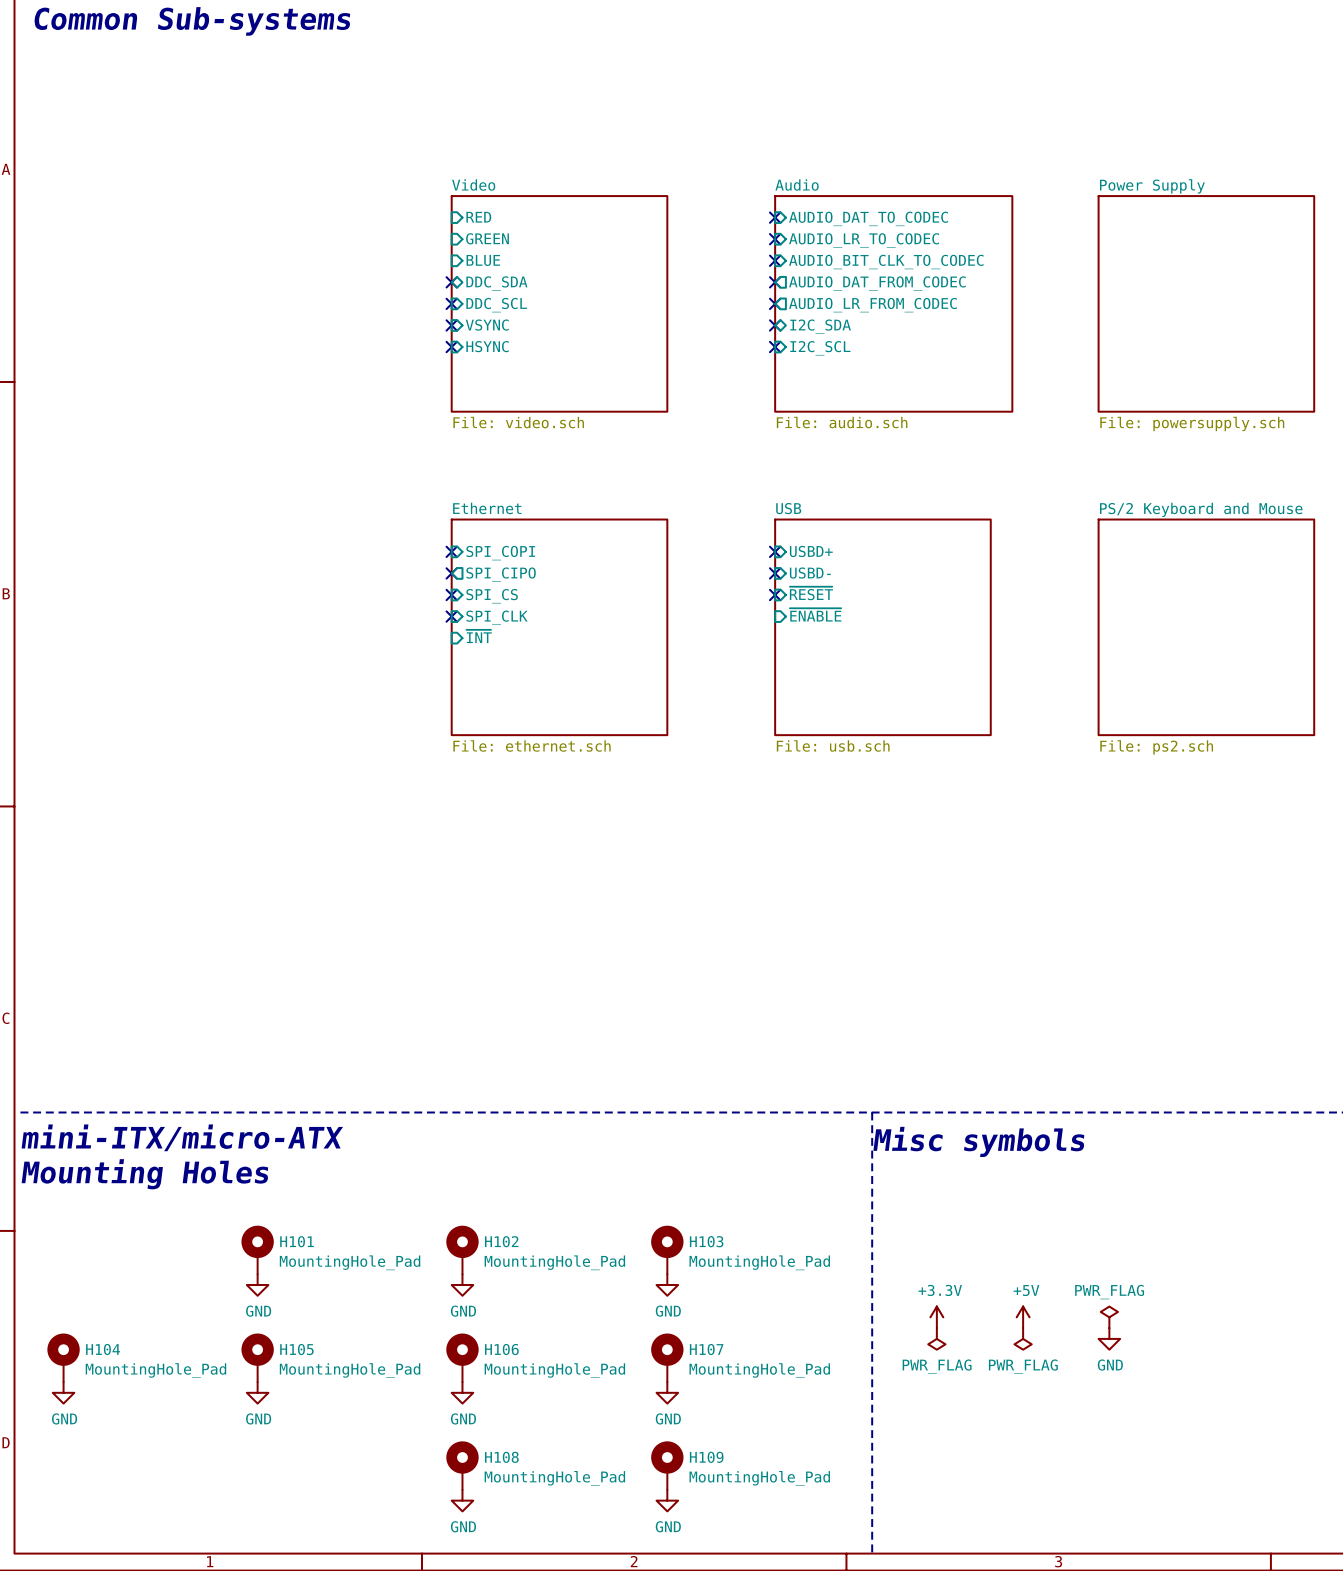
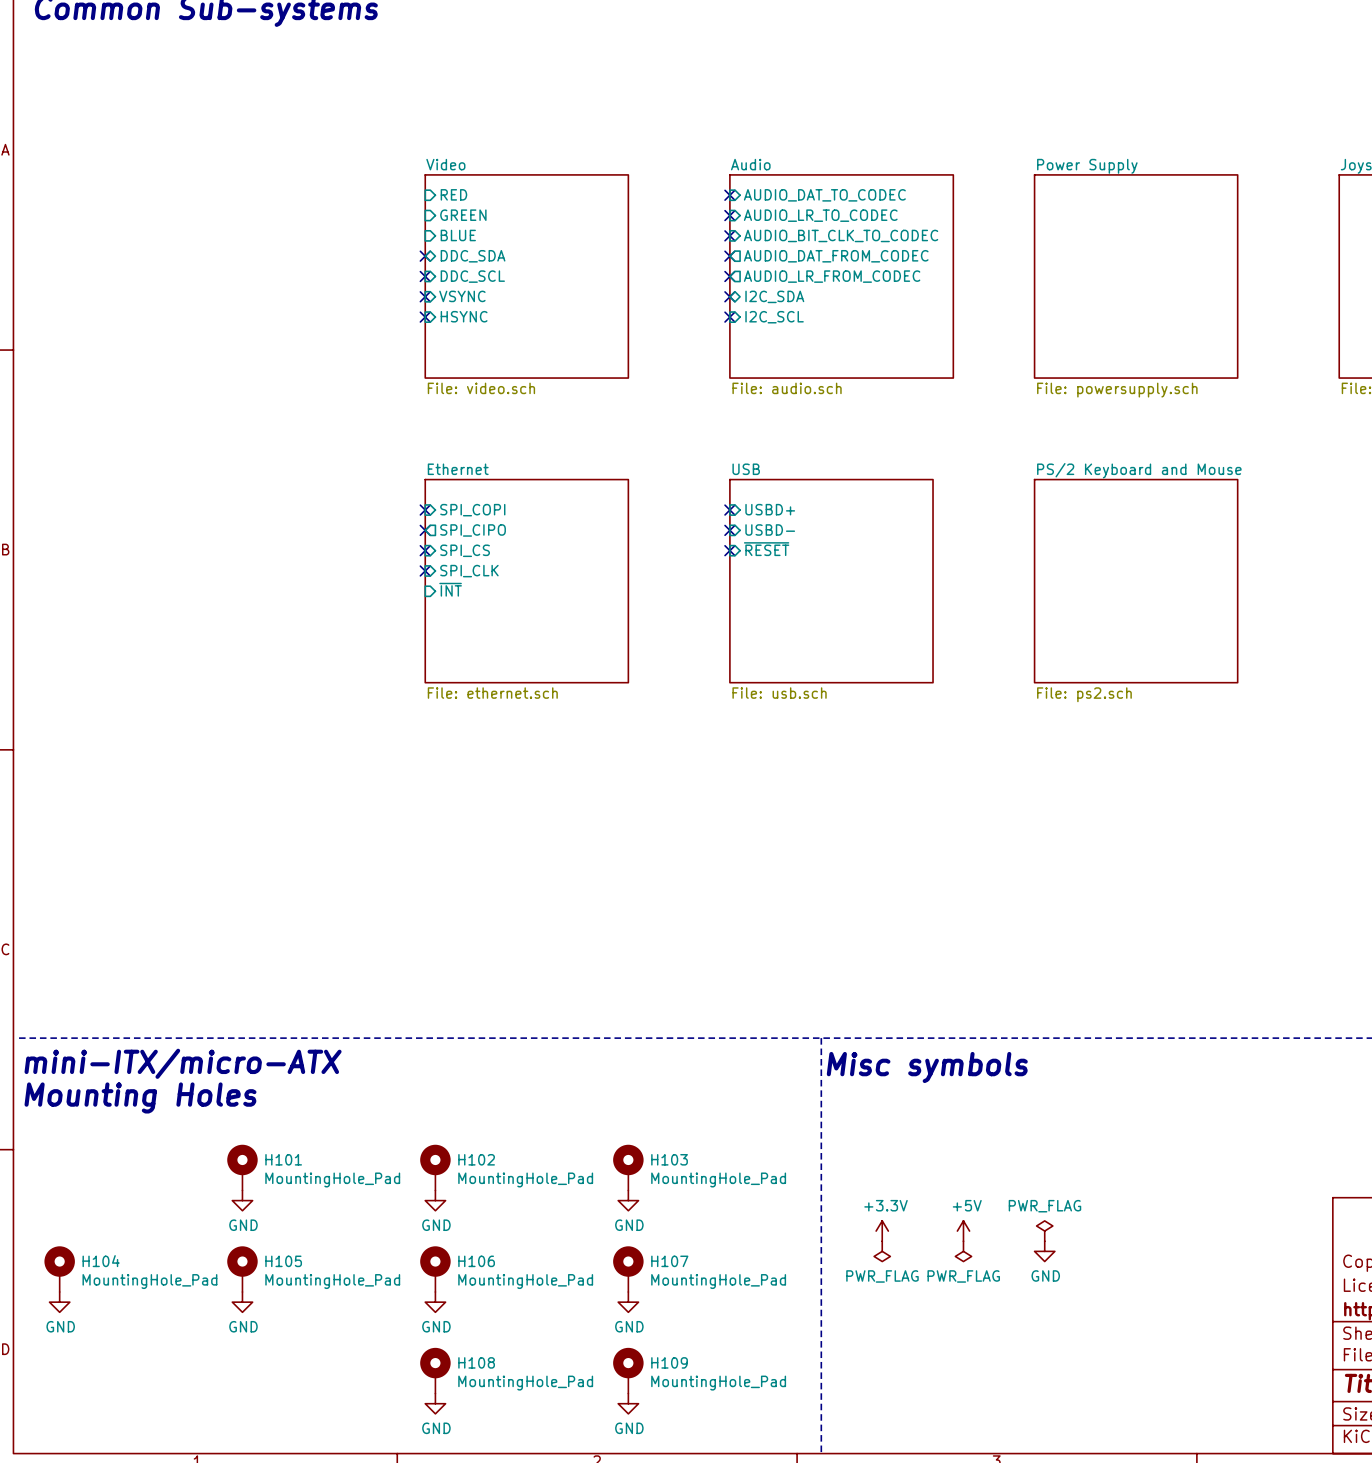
sheet pin: ~{ENABLE} (815, 614) -> none

